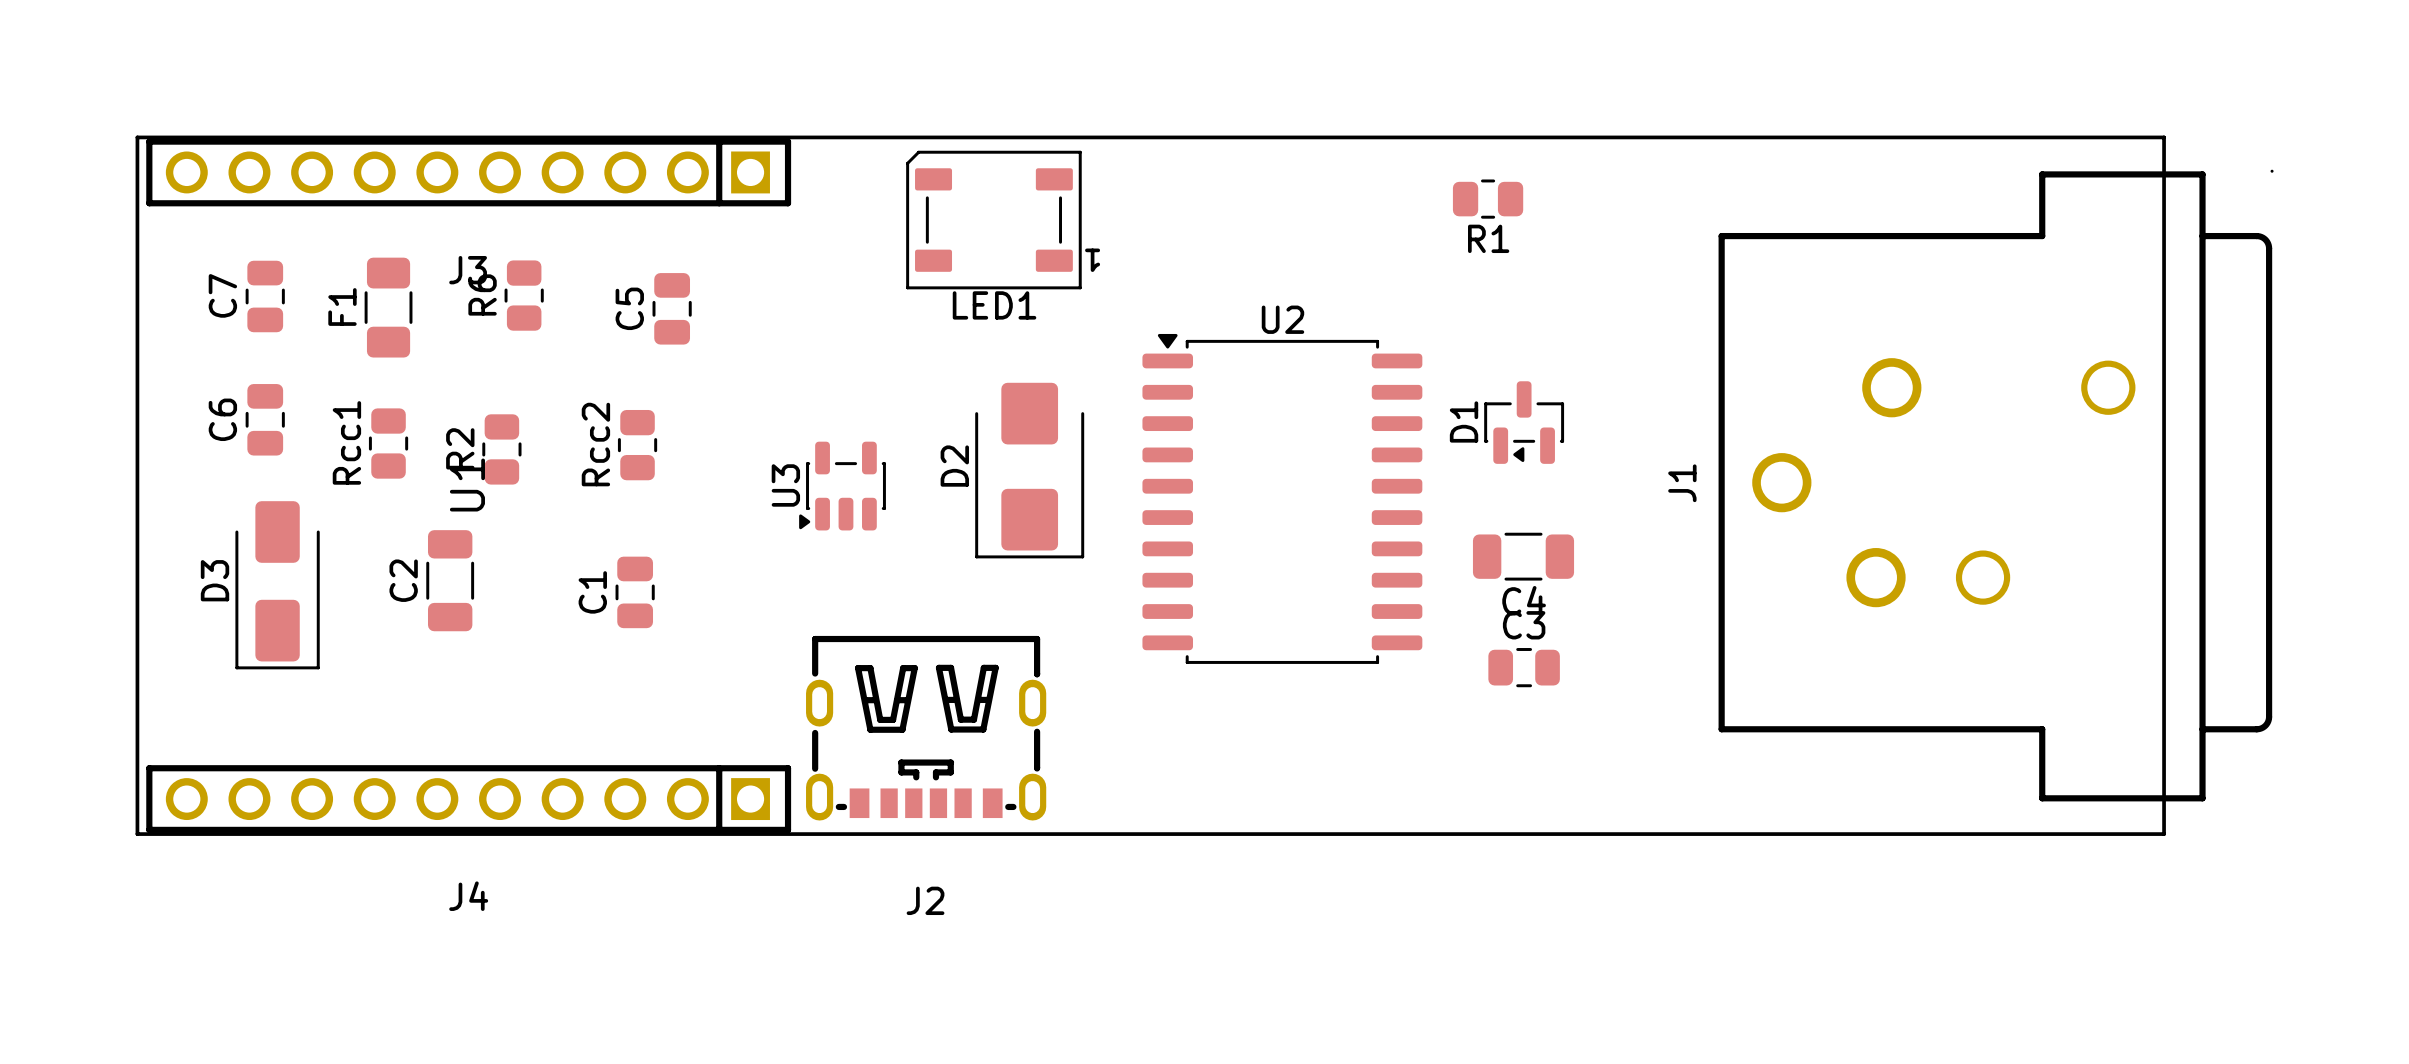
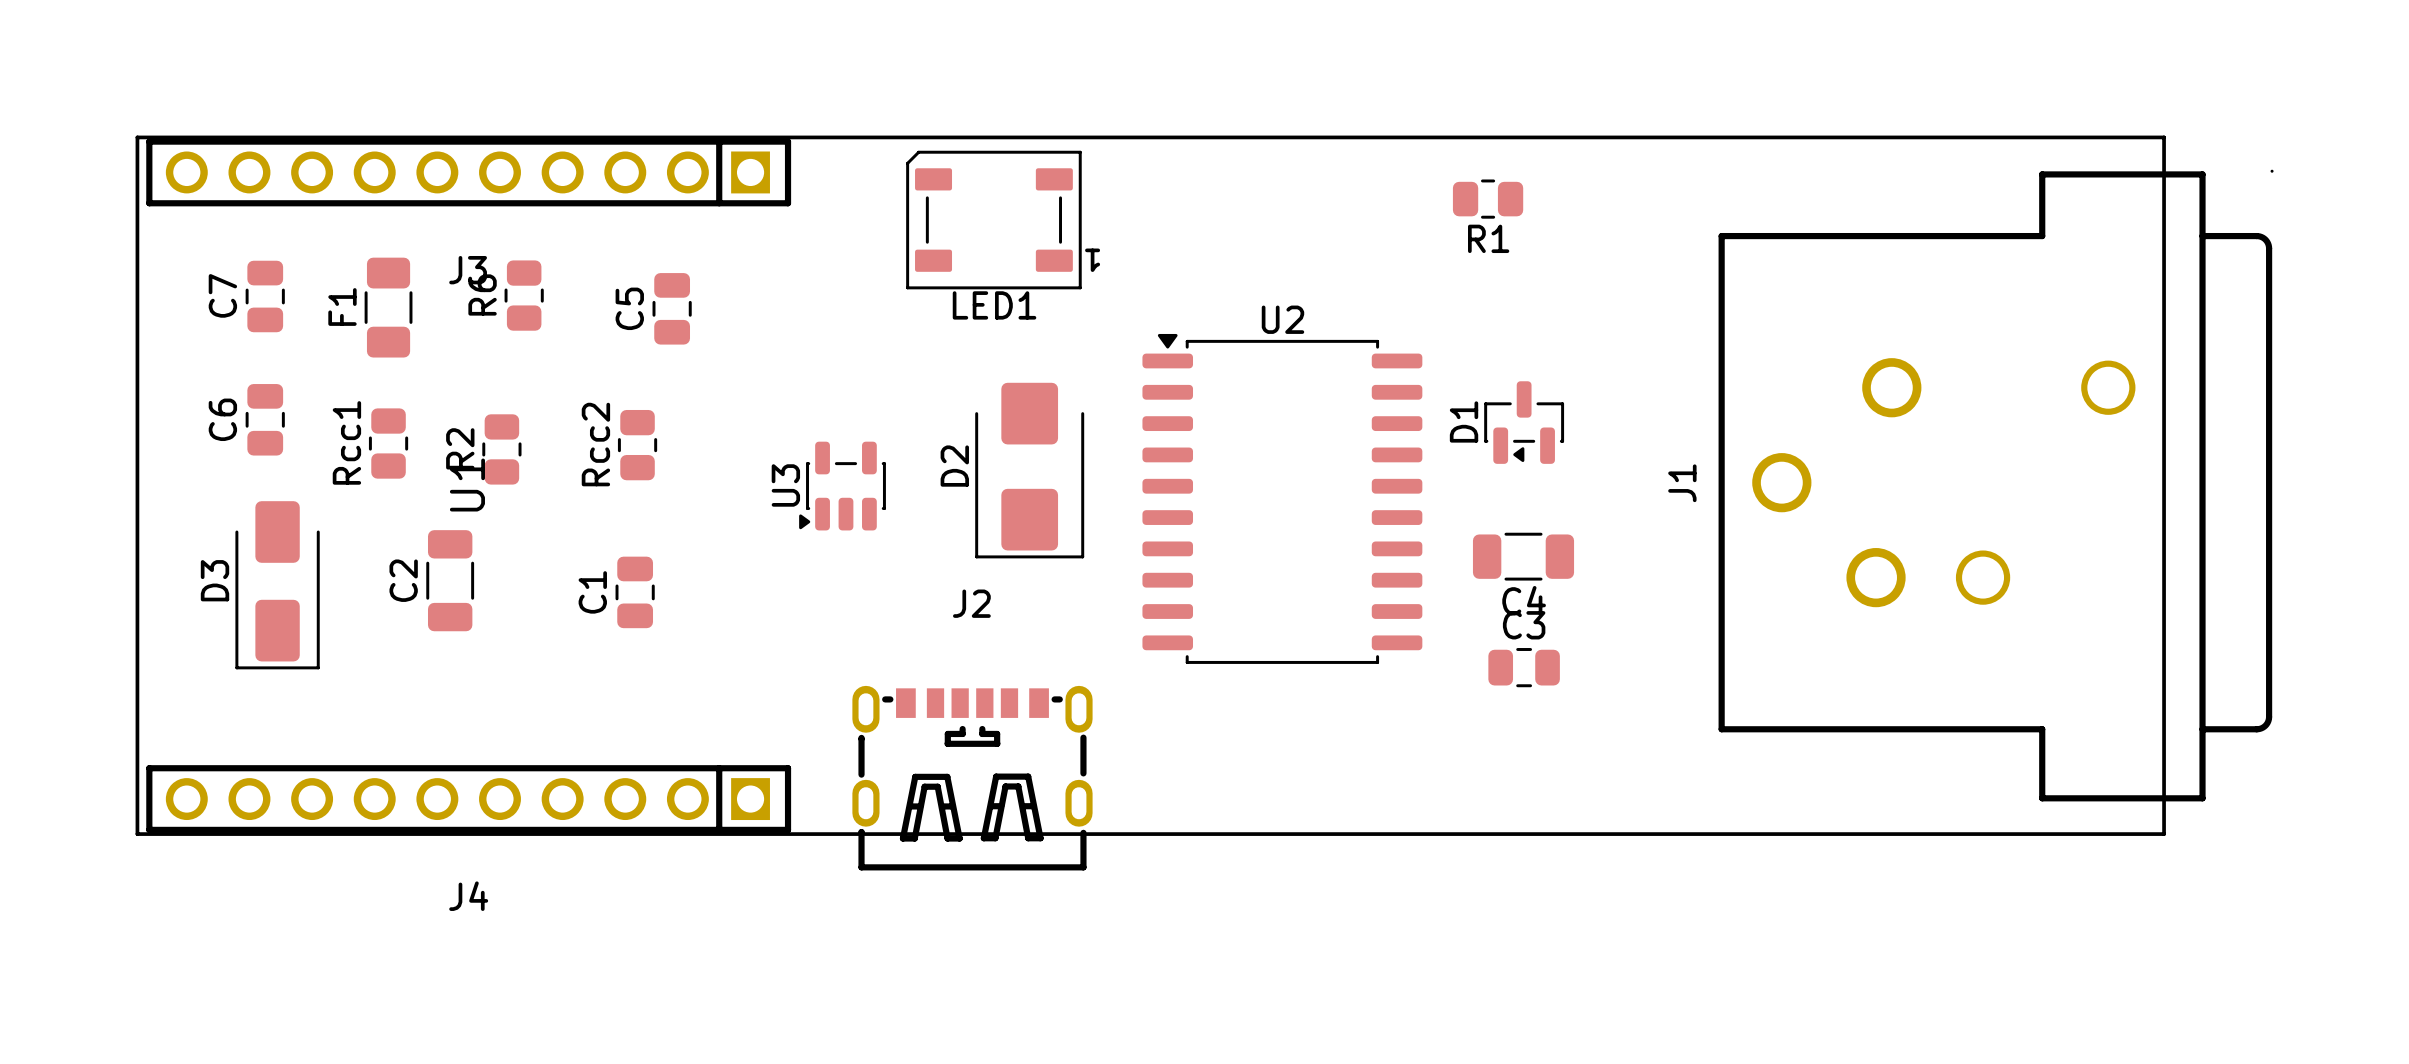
J2 rotation: 0° (926, 728) -> 180° (972, 778)

